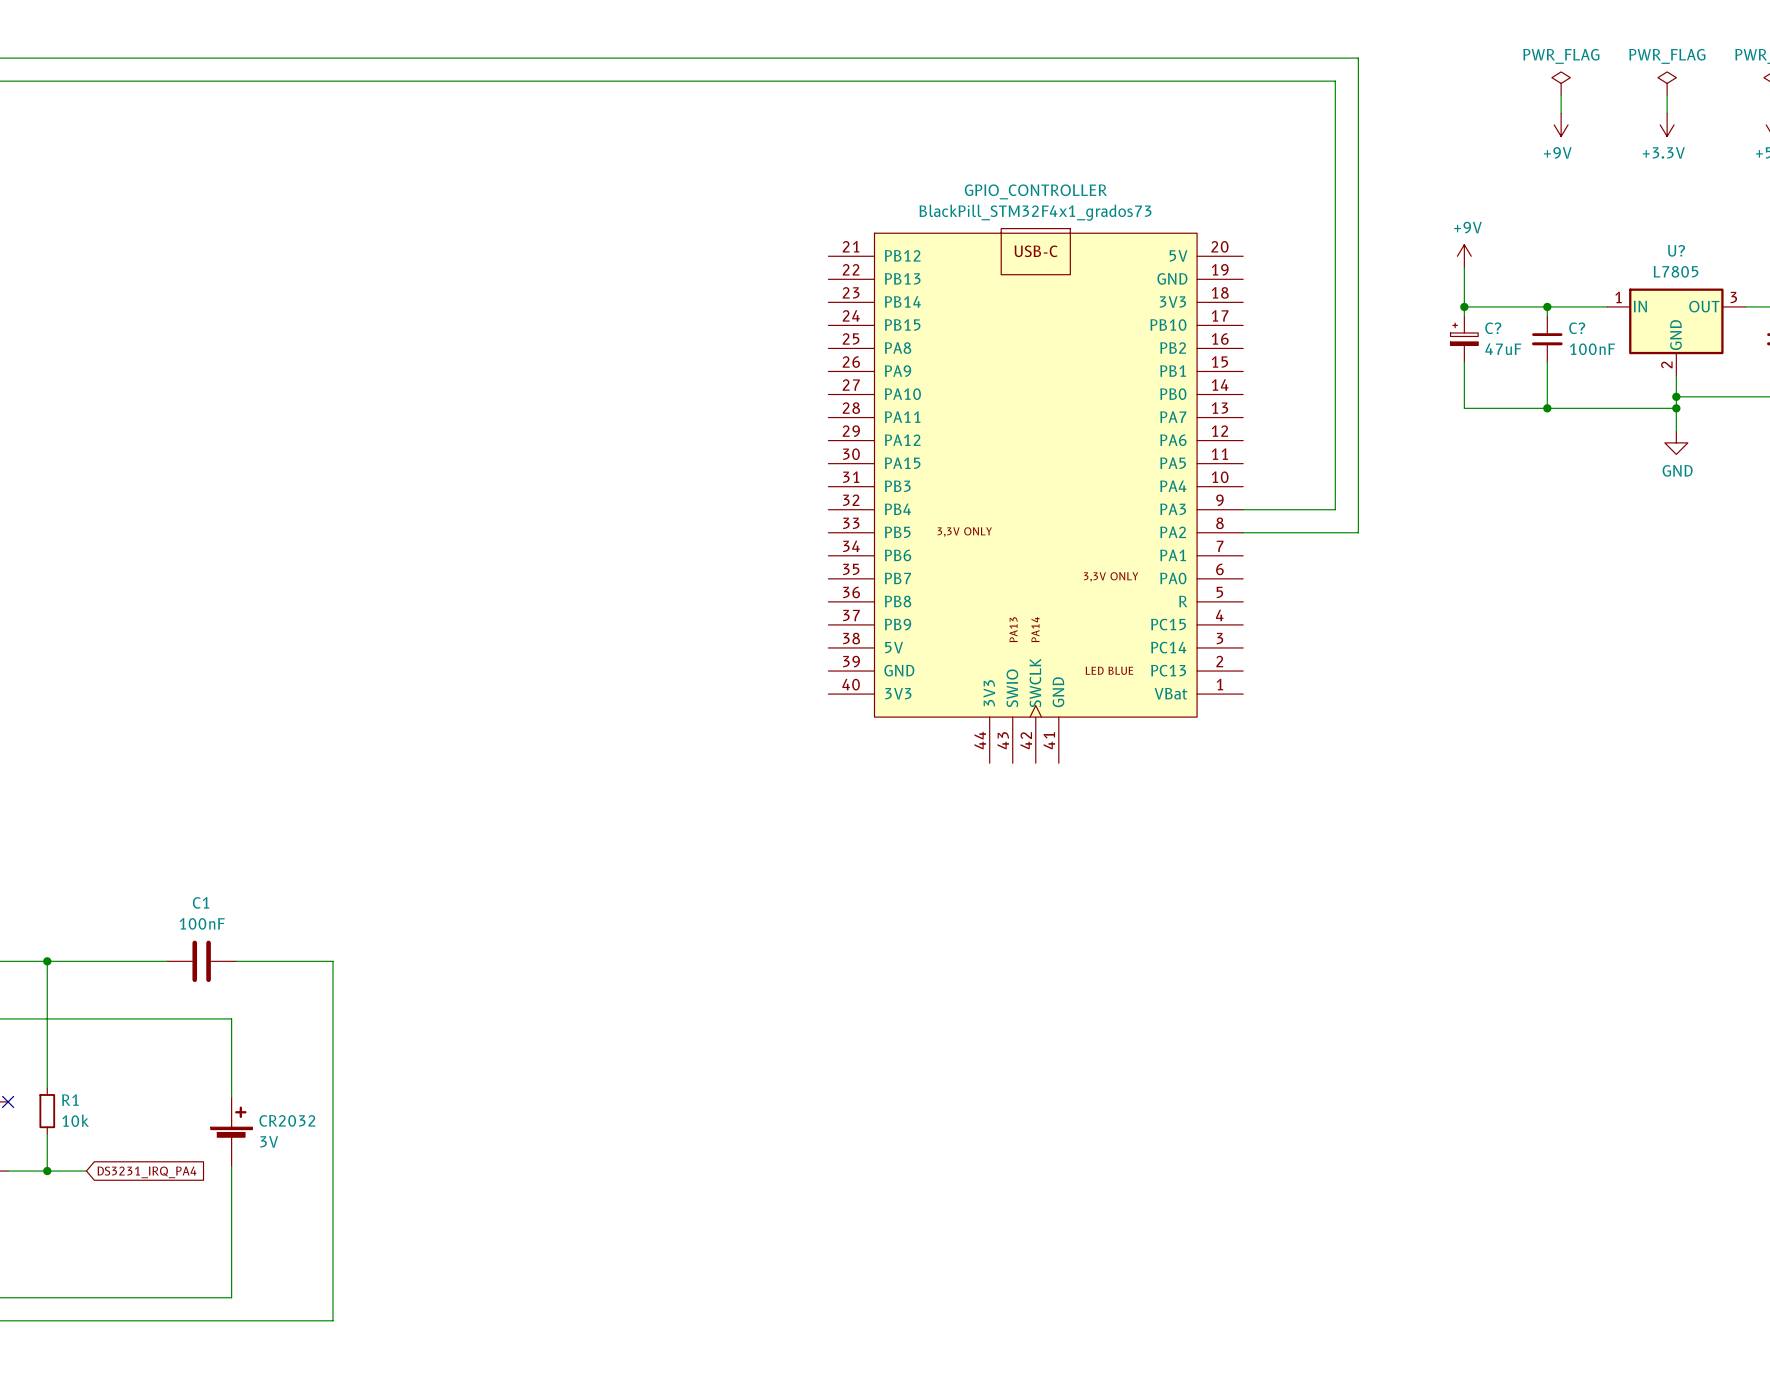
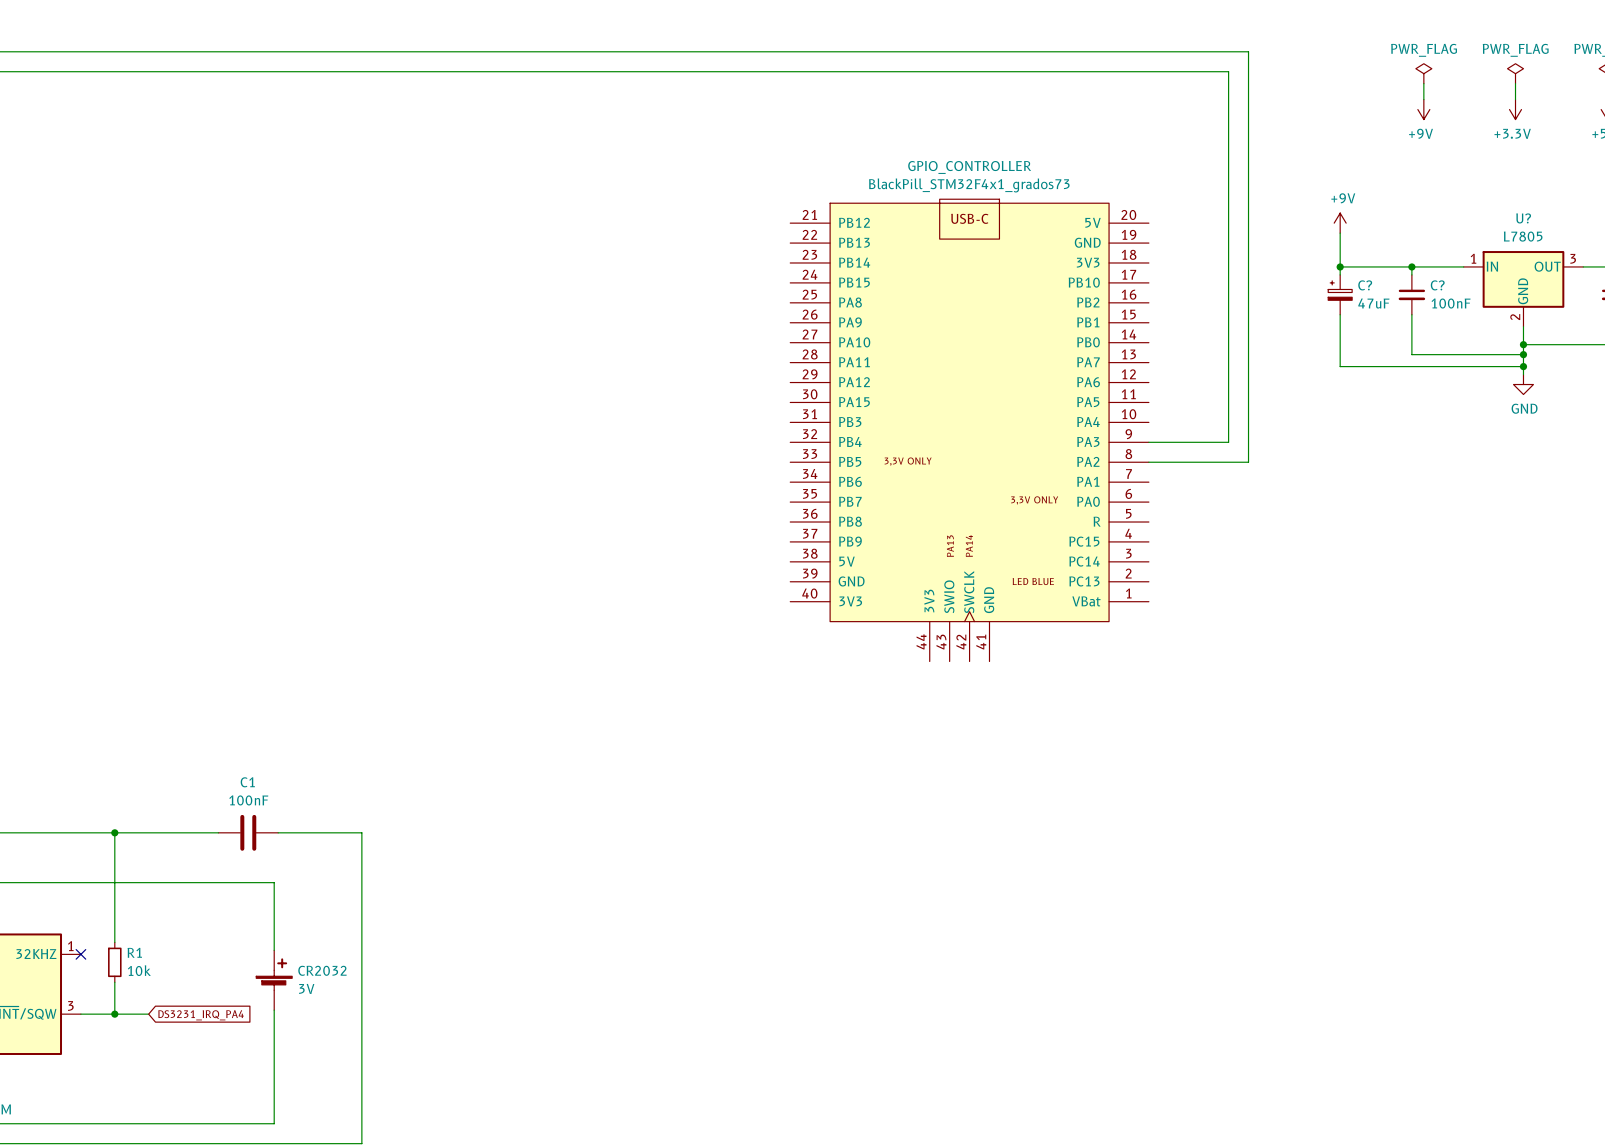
wire: (1464, 408) (1547, 408) -> (1340, 354) (1340, 366) (1523, 366)
junction: (1547, 408) -> none
junction: none -> (1523, 366)

